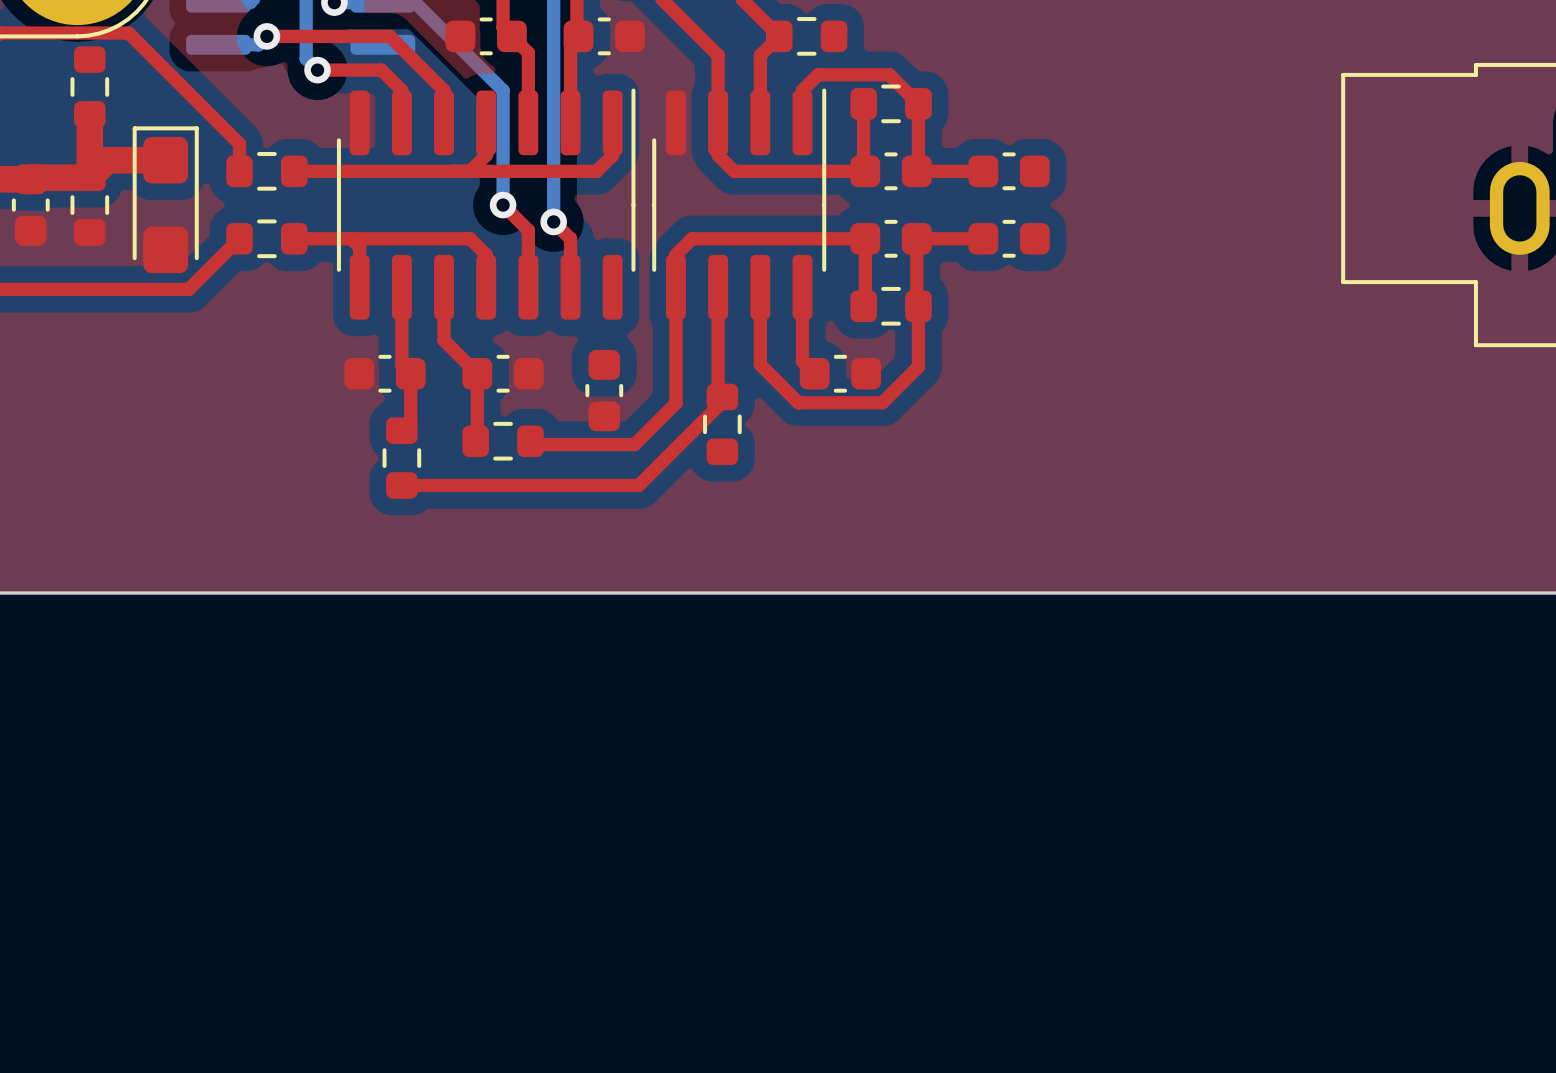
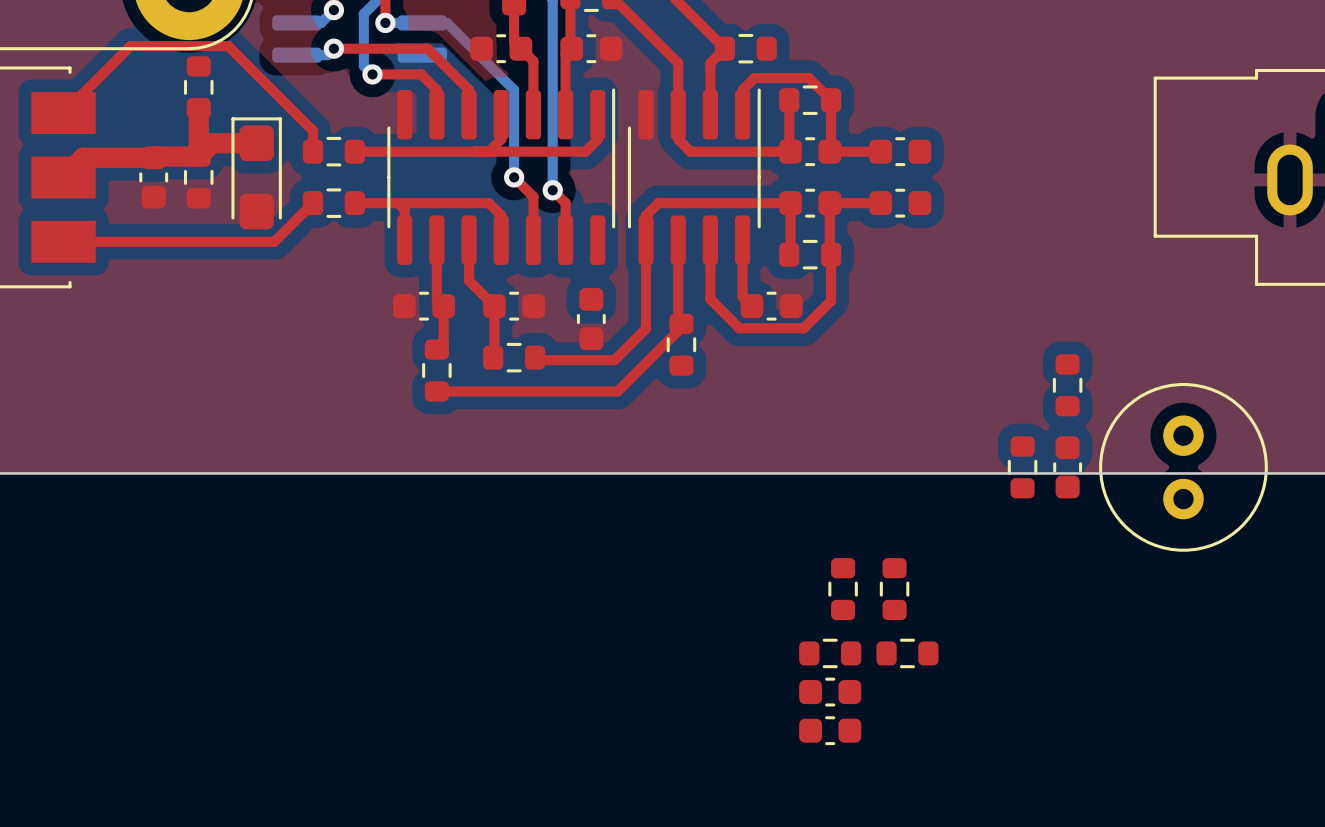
part: none -> (1067, 385)
part: none -> (1022, 467)
part: none -> (1067, 467)
part: none -> (1183, 467)
part: none -> (843, 589)
part: none -> (894, 589)
part: none -> (830, 653)
part: none -> (907, 653)
part: none -> (830, 692)
part: none -> (830, 730)

